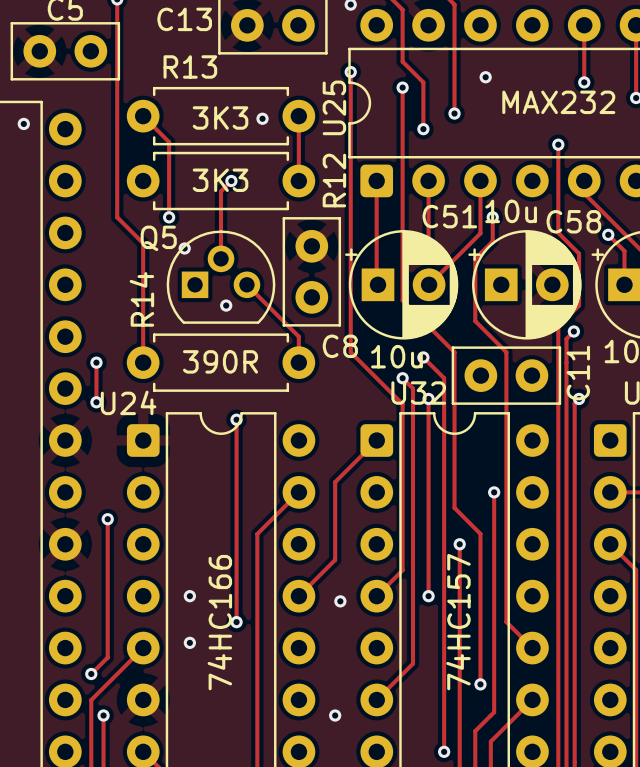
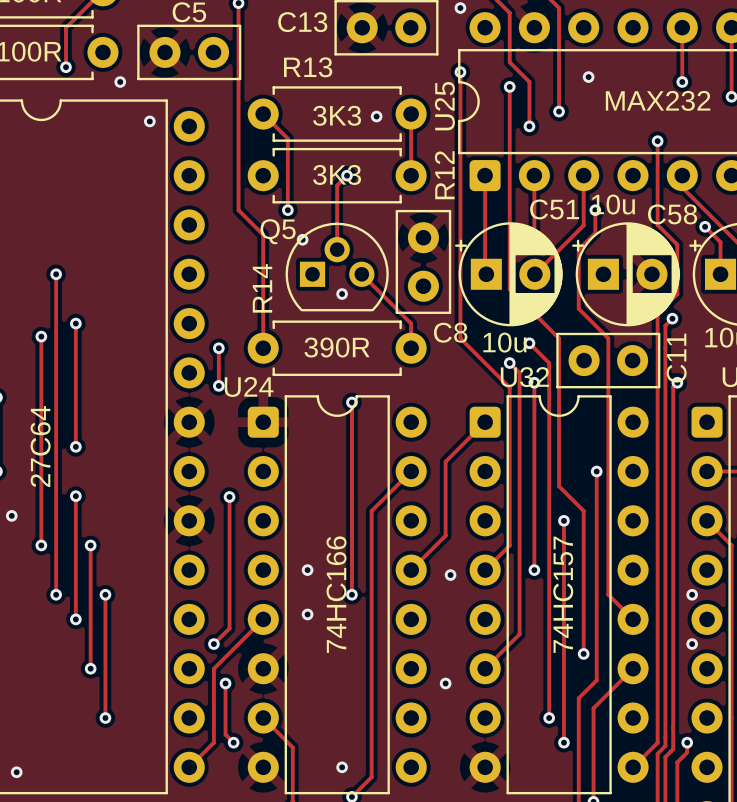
via: none -> (692, 594)
via: none -> (692, 644)

